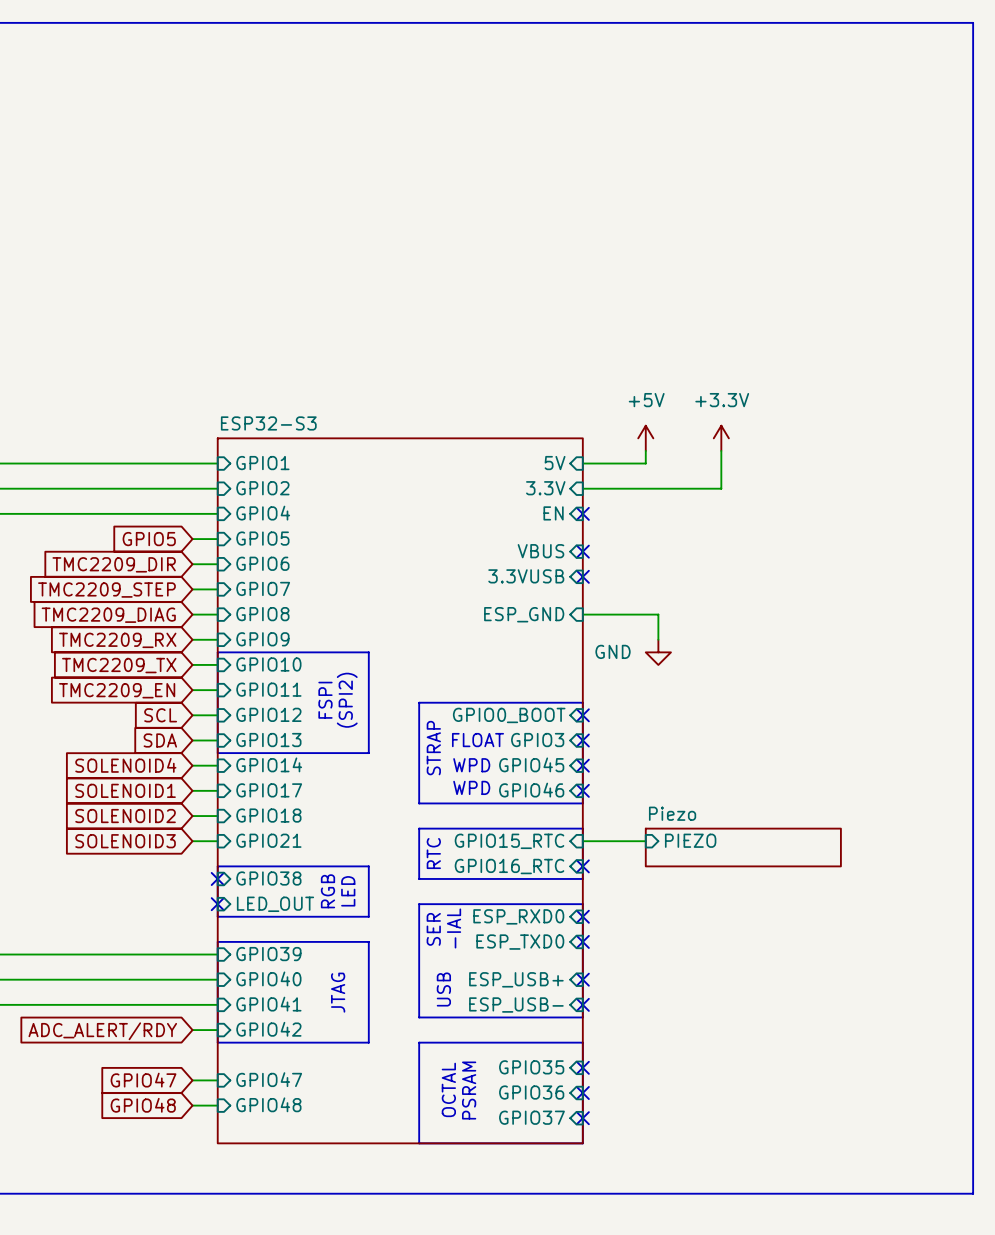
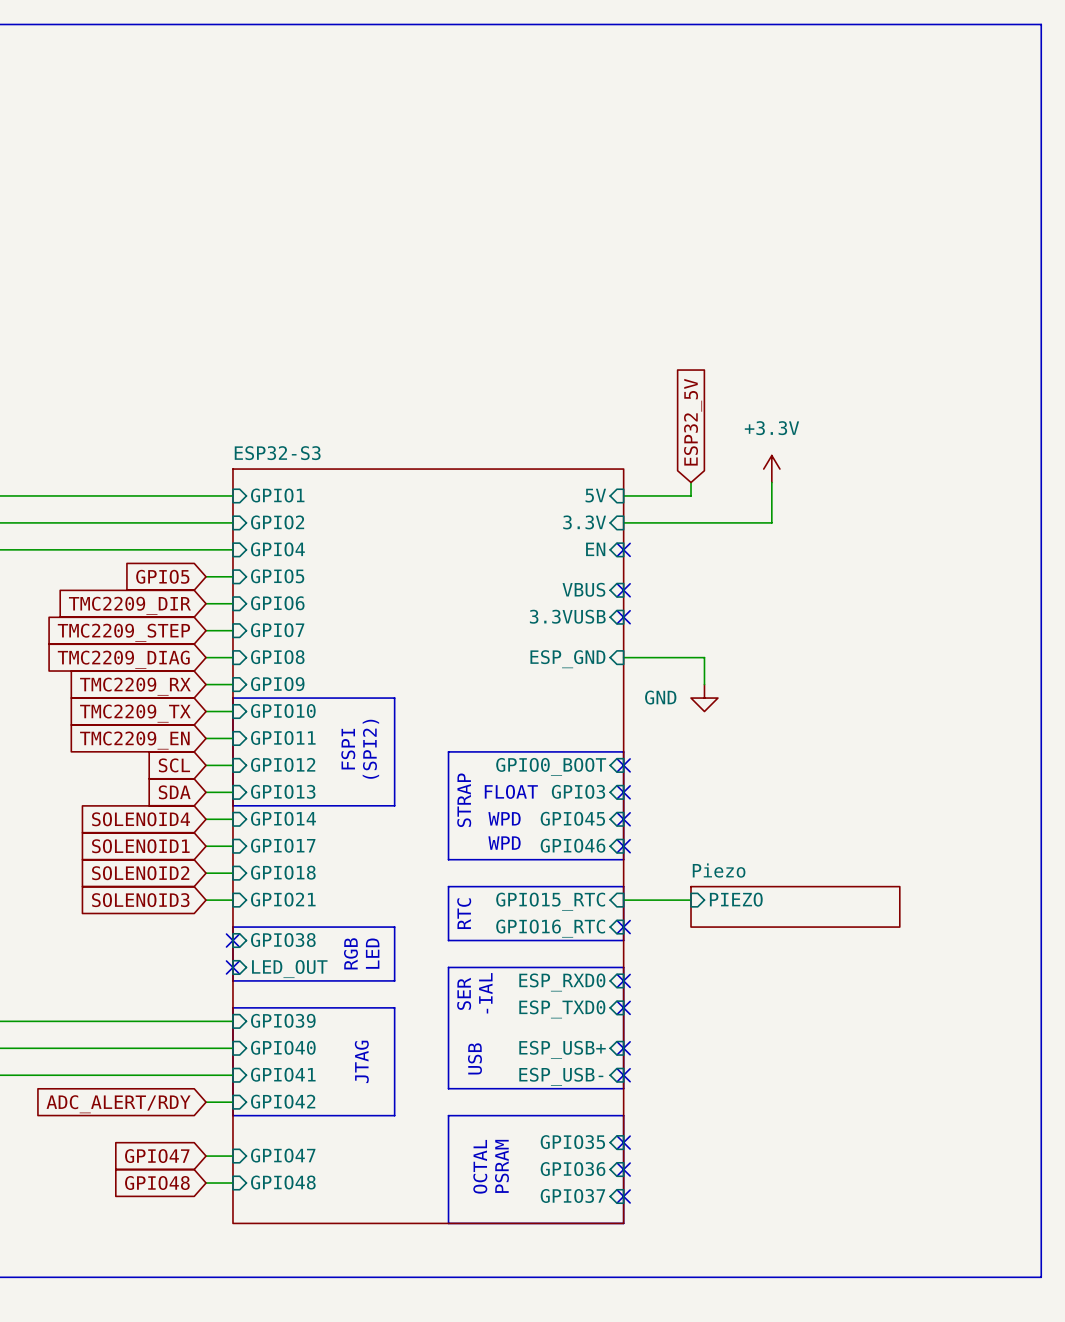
global label: none -> ESP32_5V (693, 422)
power symbol: +5V (645, 438) -> none

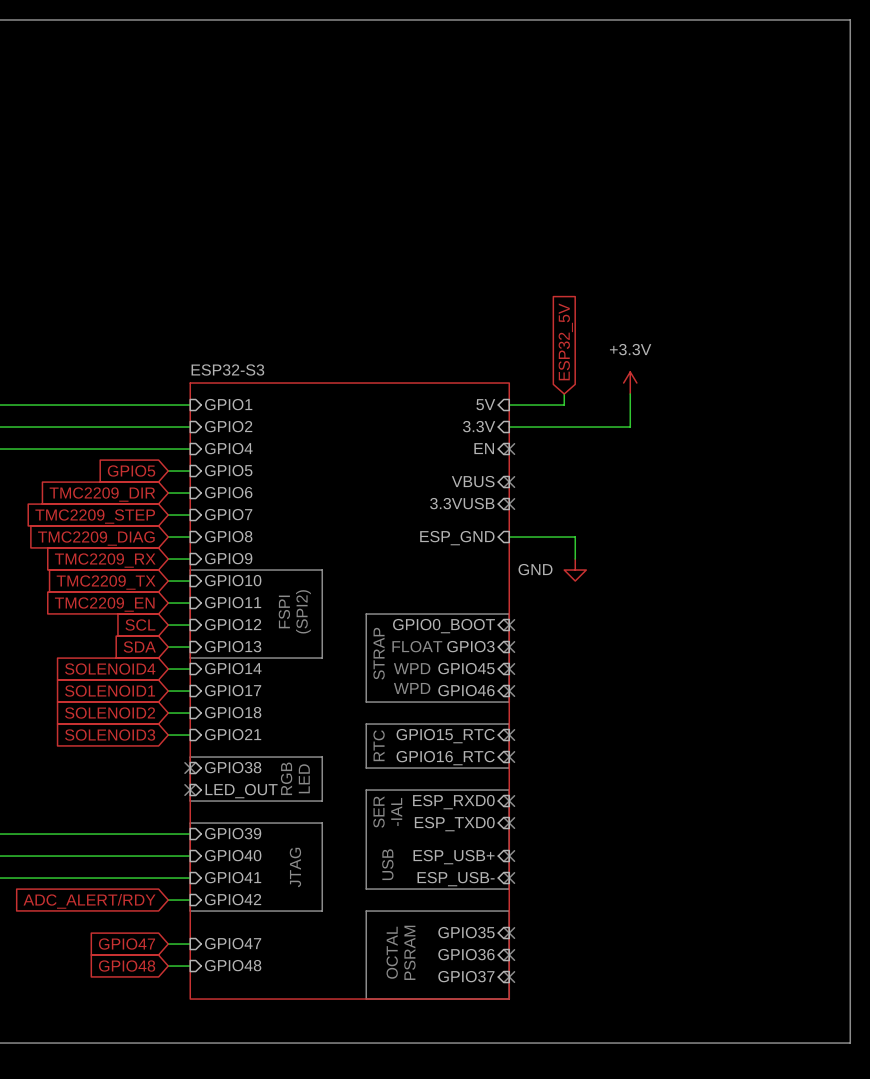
sheet pin: PIEZO (736, 899) -> none
wire: (623, 900) (691, 900) -> none
no-connect mark: none -> (509, 735)
sheet Piezo: (795, 906) -> none

